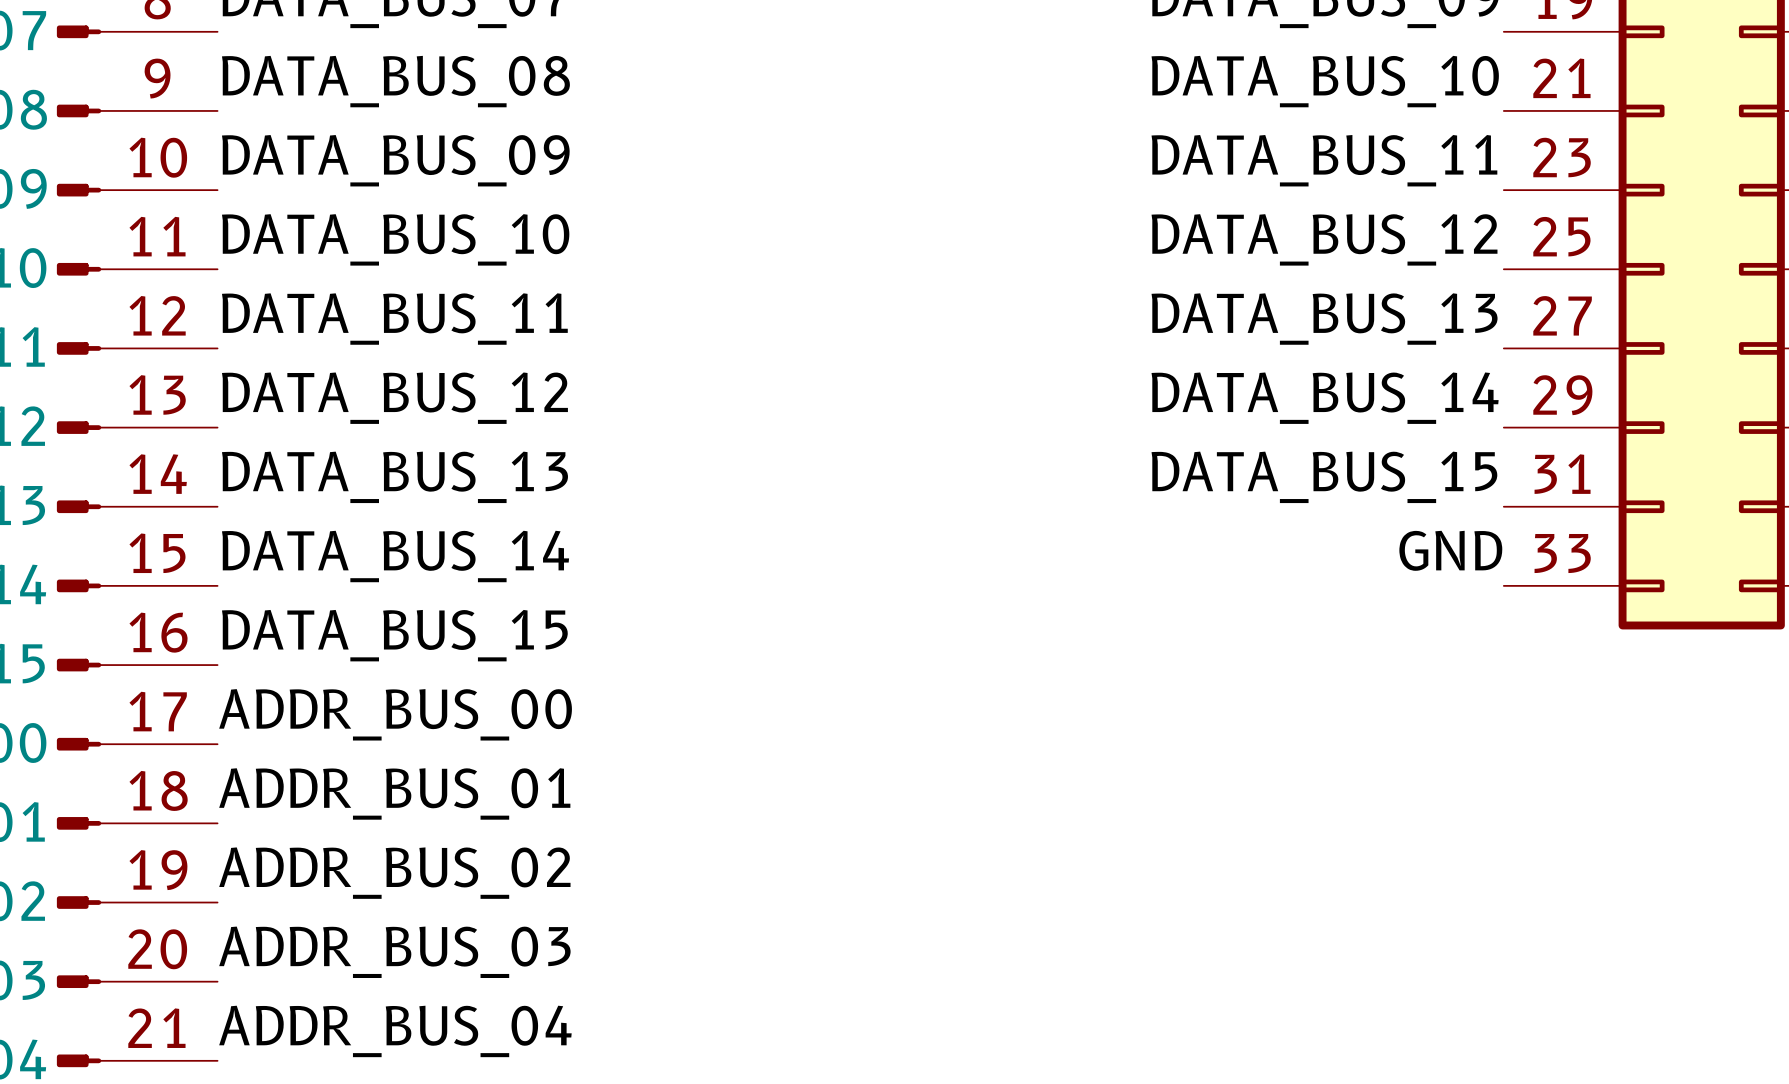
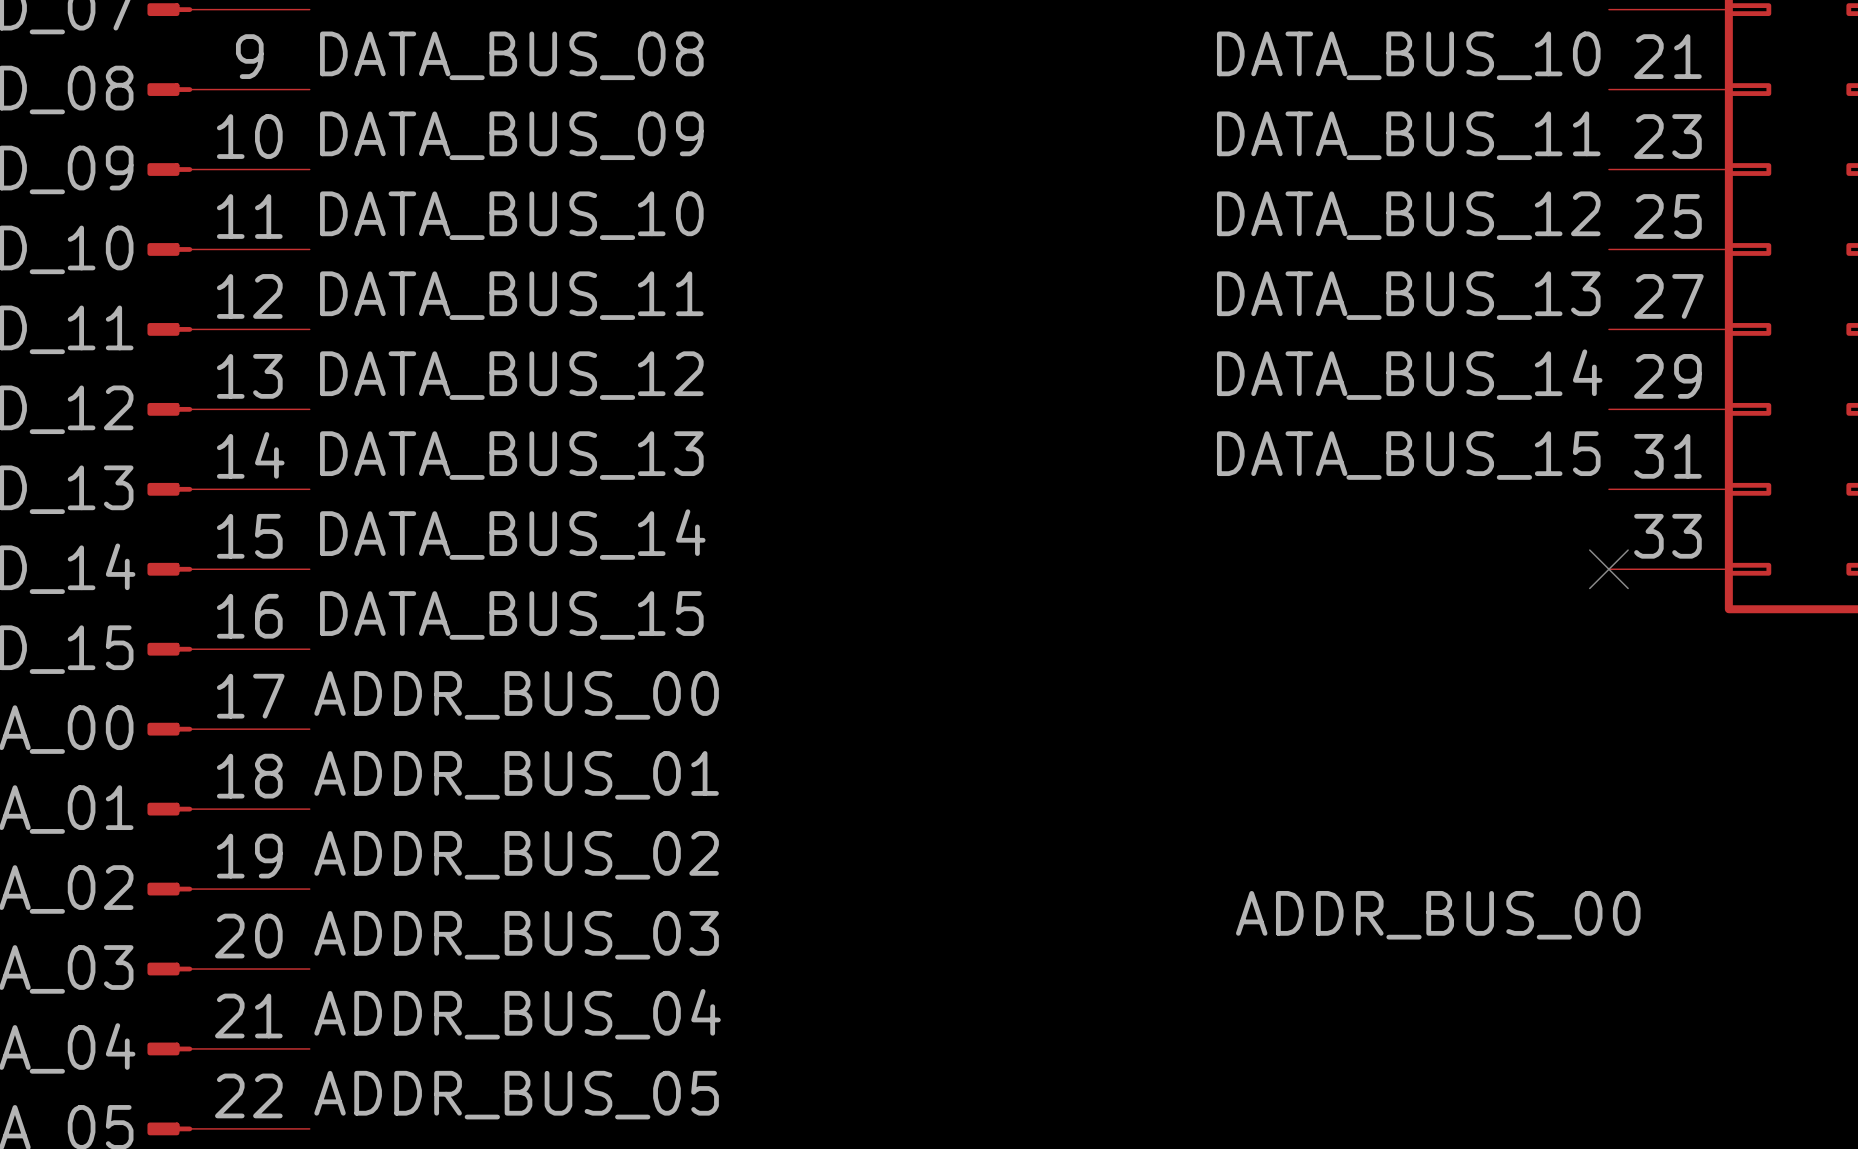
label: GND (1450, 550) -> none
no-connect mark: none -> (1608, 569)
label: none -> ADDR_BUS_00 (1438, 915)

